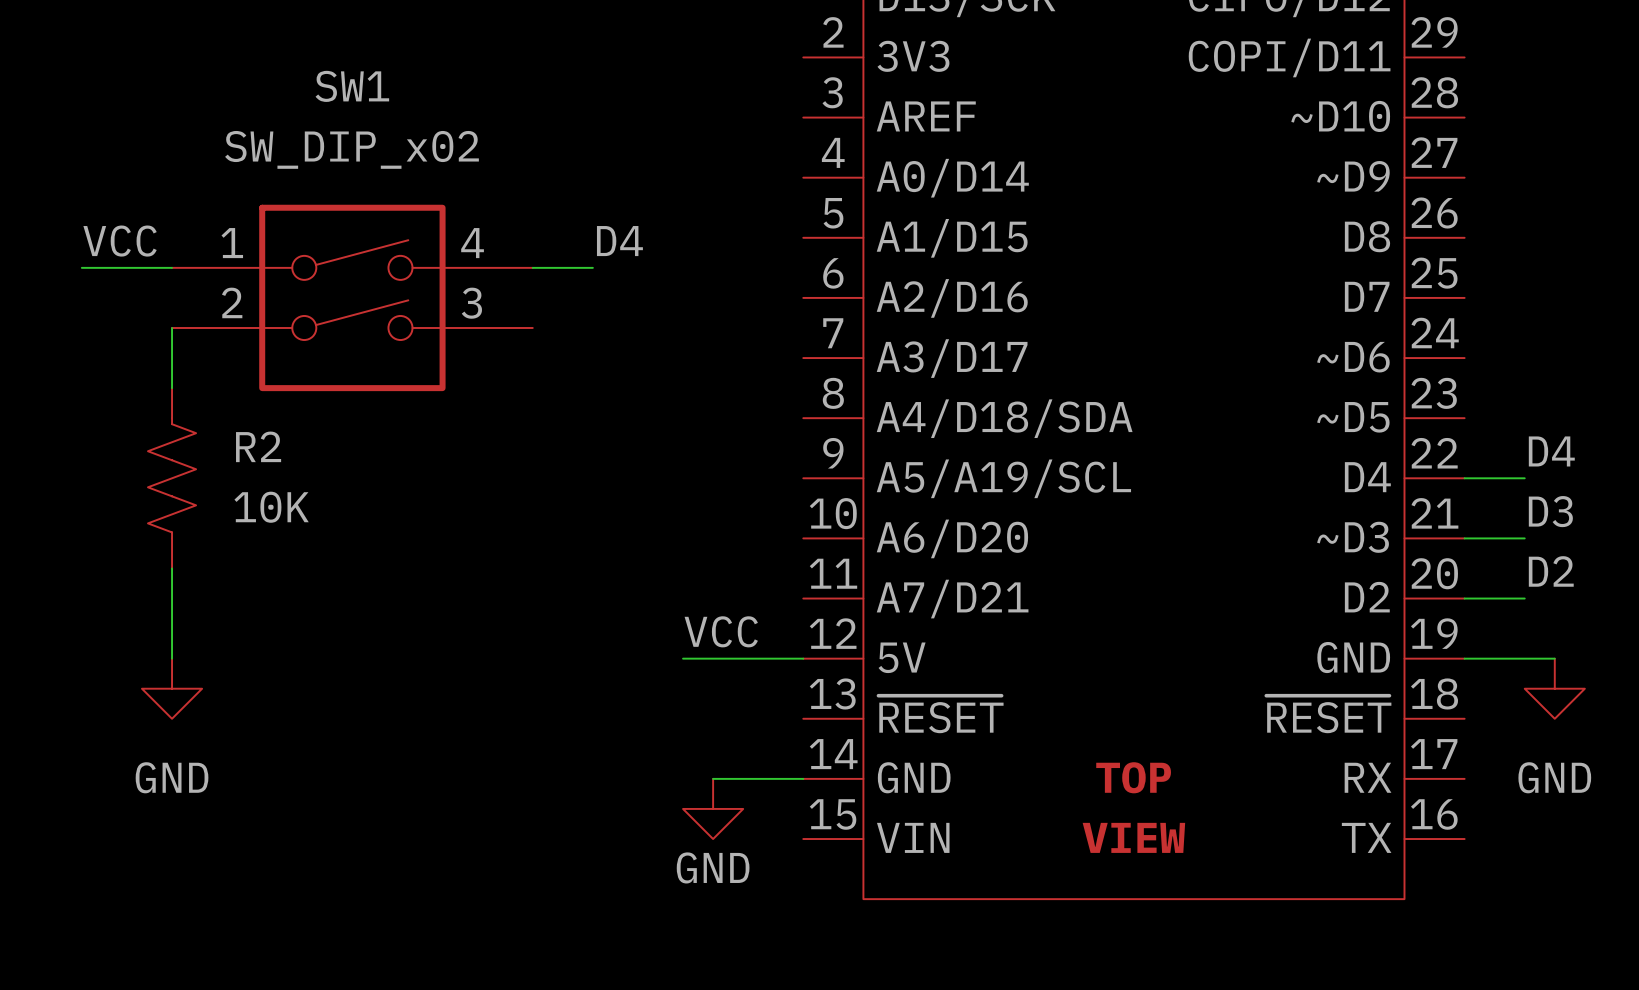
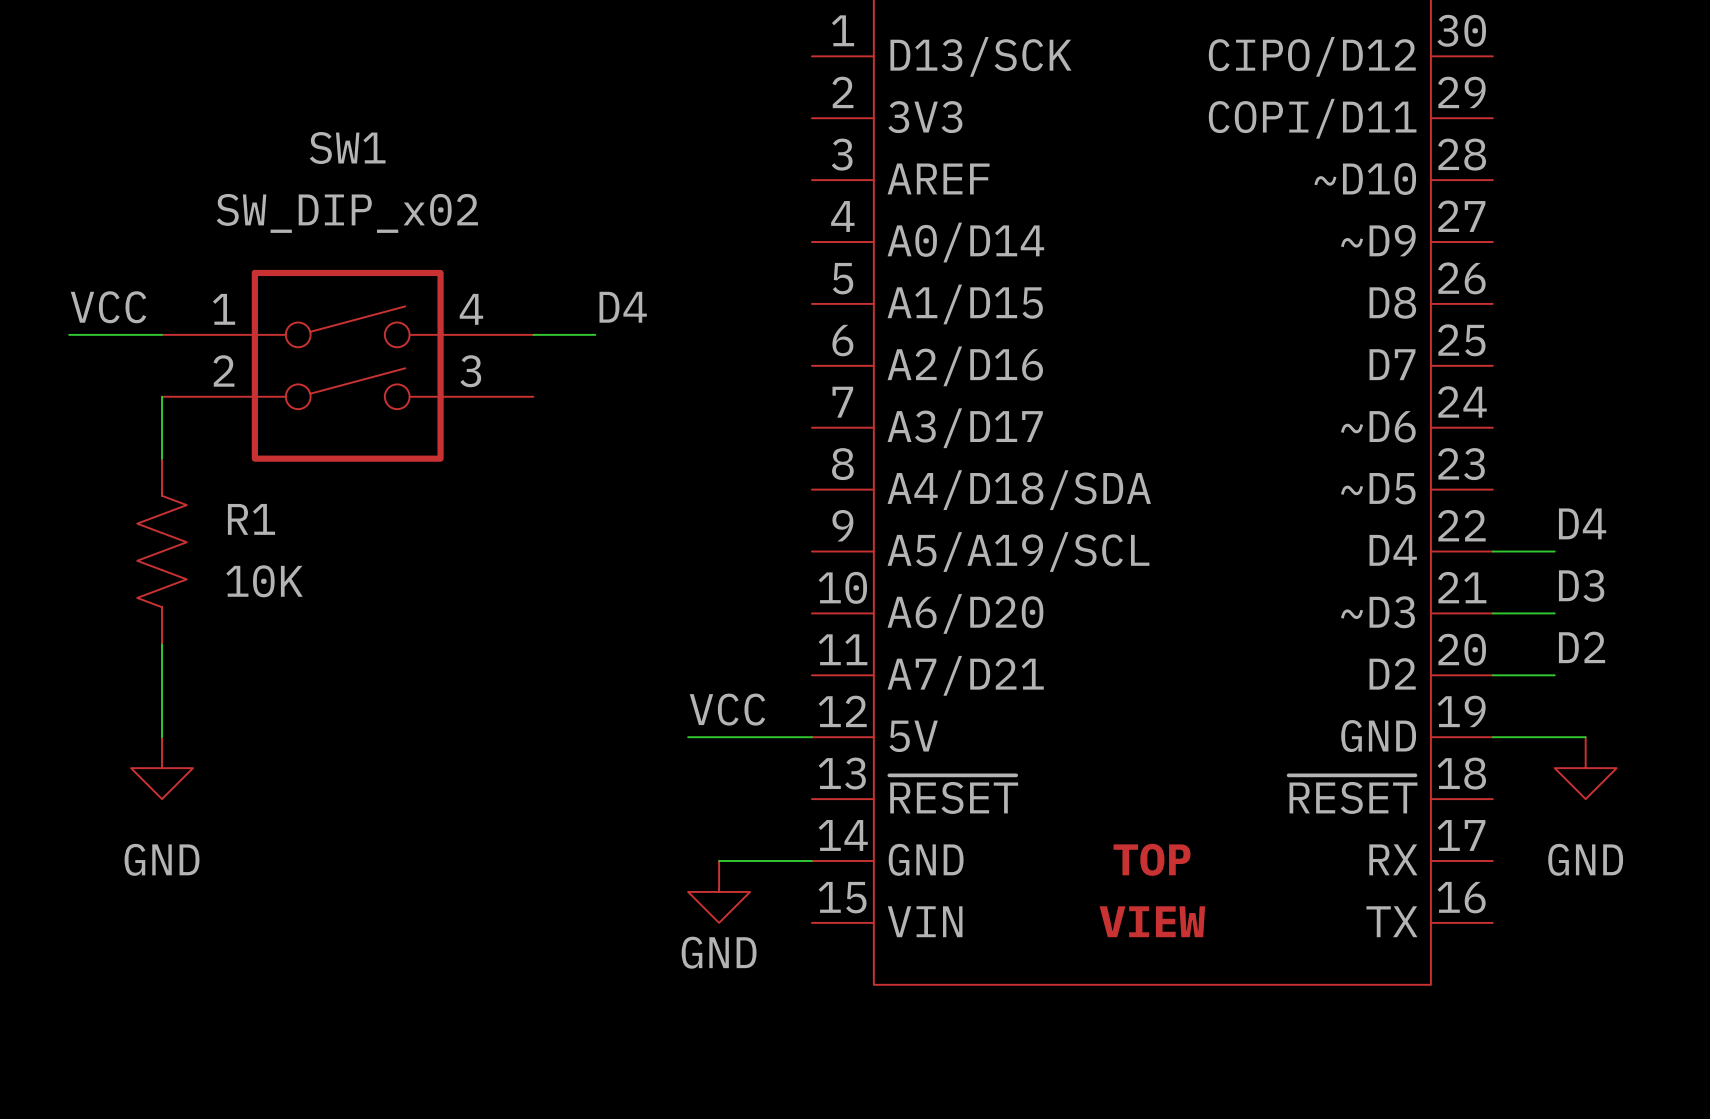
R2 name: R2 (258, 446) -> R1 (251, 519)

